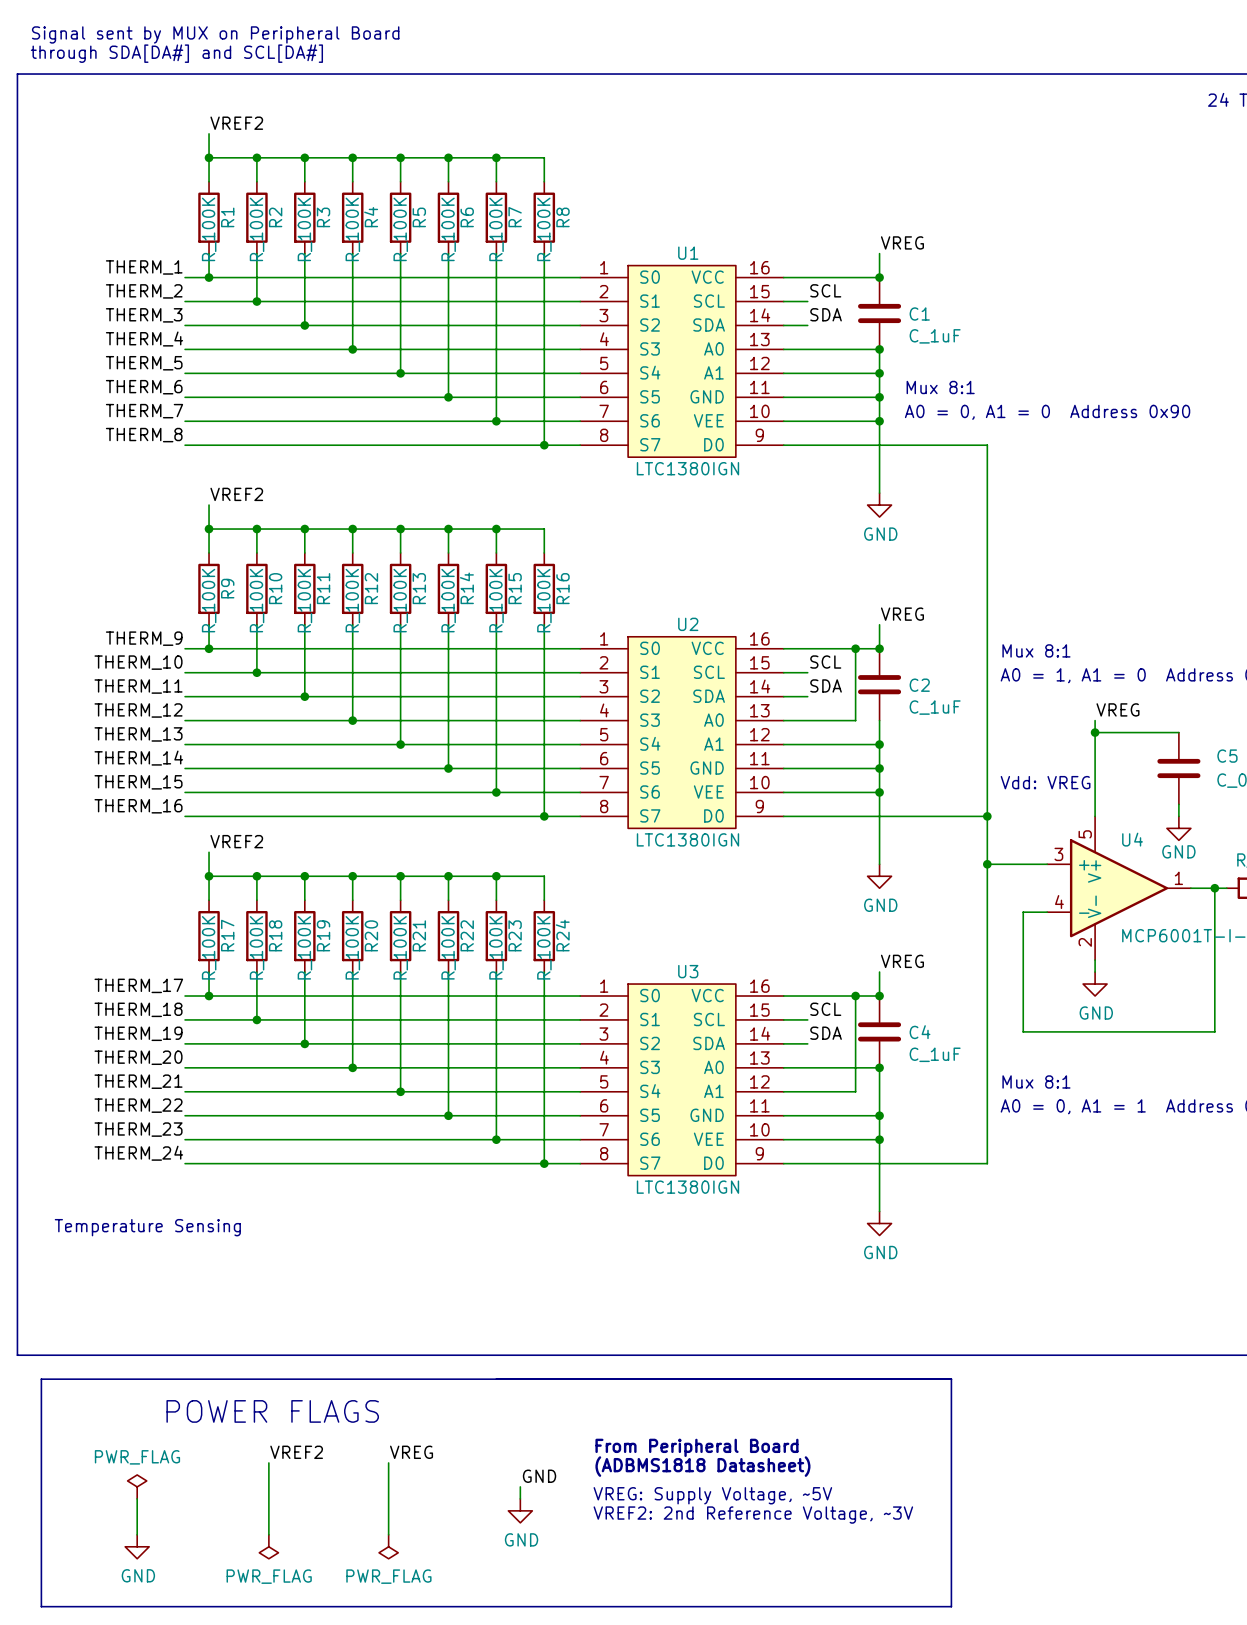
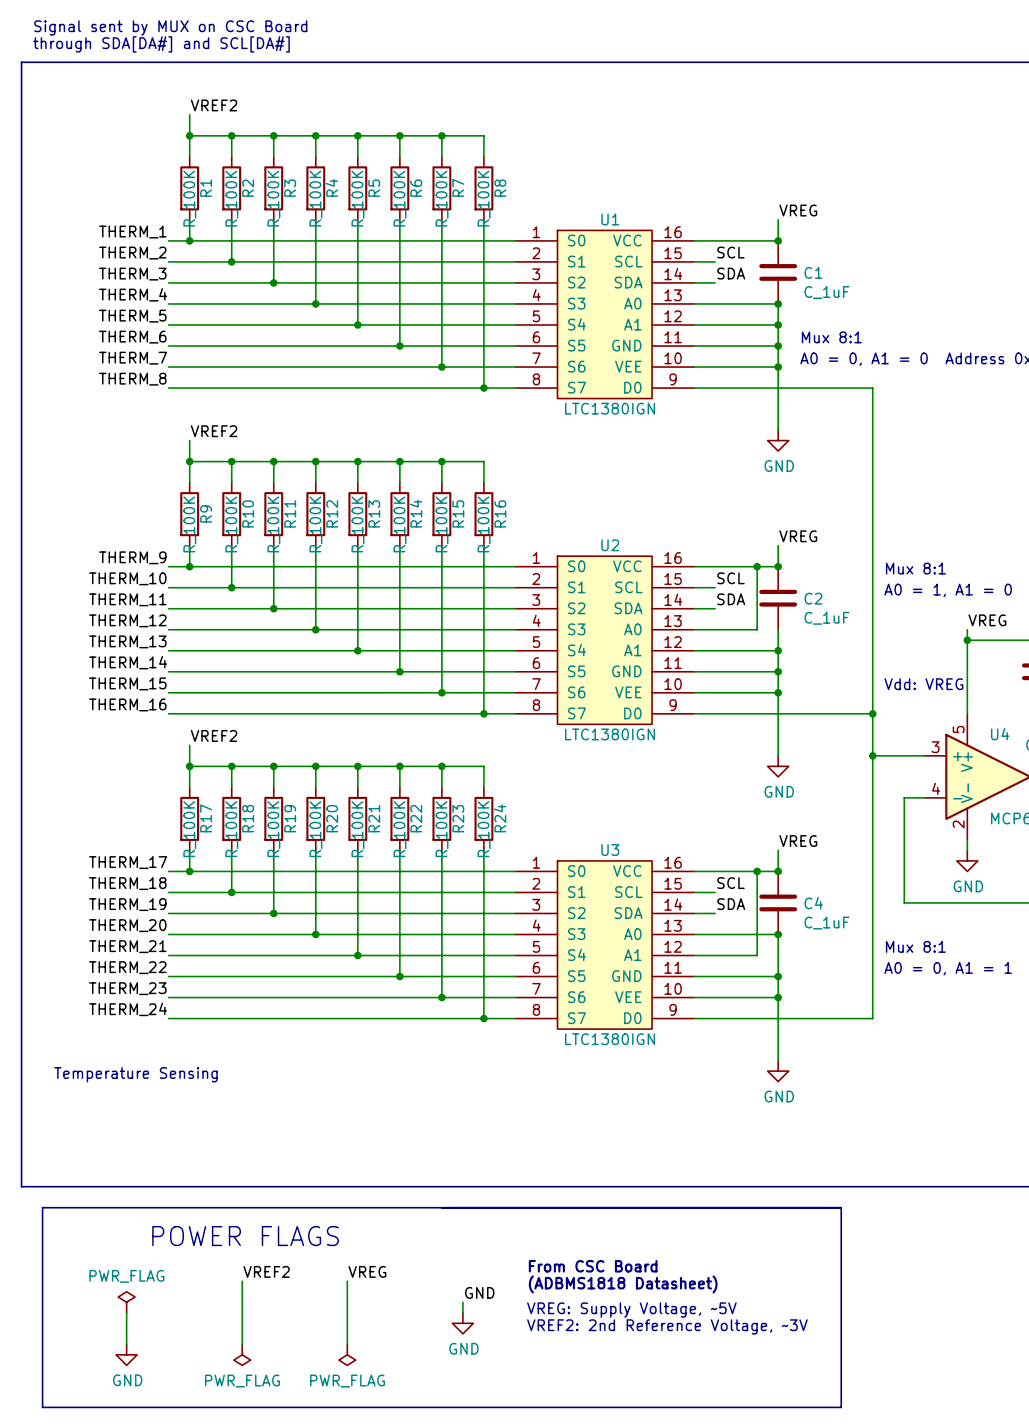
text: Signal sent by MUX on Peripheral Board (215, 34) -> Signal sent by MUX on CSC Board (170, 27)
text: From Peripheral Board (696, 1447) -> From CSC Board (593, 1266)

